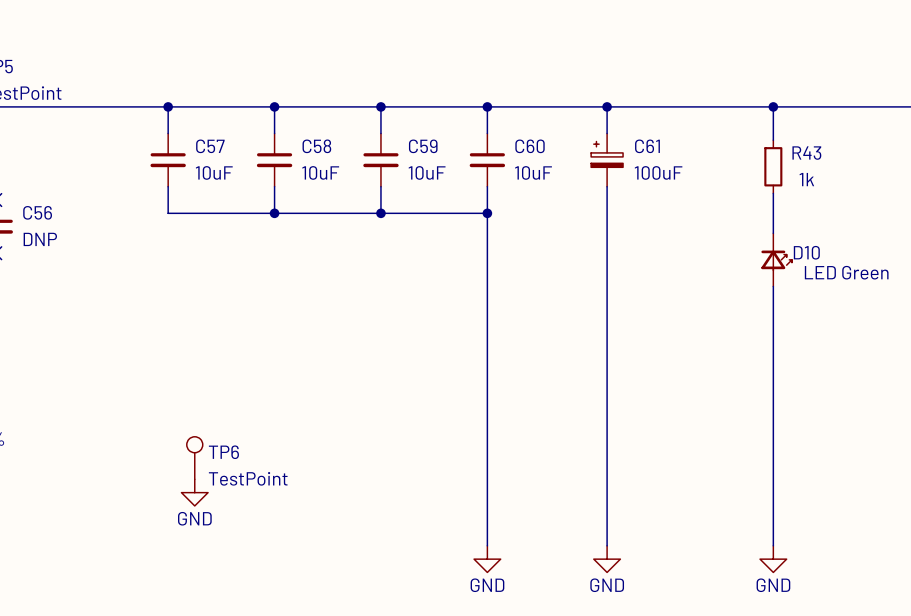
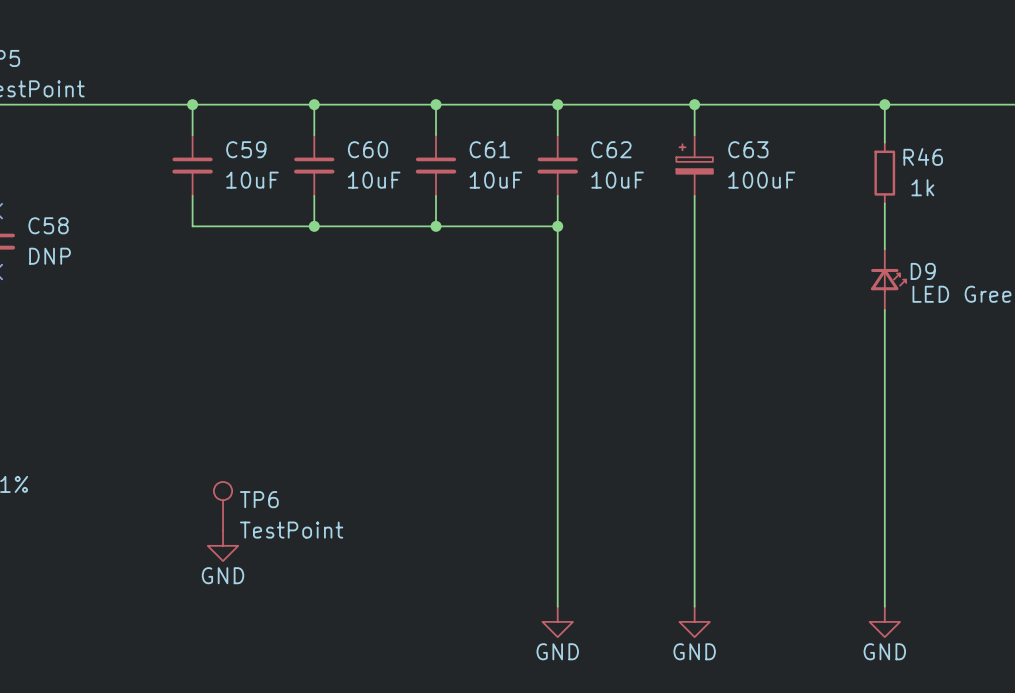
C57 name: C57 (210, 146) -> C59 (246, 149)
C58 name: C58 (316, 146) -> C60 (368, 149)
C59 name: C59 (423, 146) -> C61 (489, 149)
C60 name: C60 (530, 146) -> C62 (611, 149)
C61 name: C61 (647, 146) -> C63 (748, 149)
R43 name: R43 (806, 153) -> R46 (923, 156)
C56 name: C56 (37, 212) -> C58 (48, 225)
D10 name: D10 (806, 252) -> D9 (923, 271)

